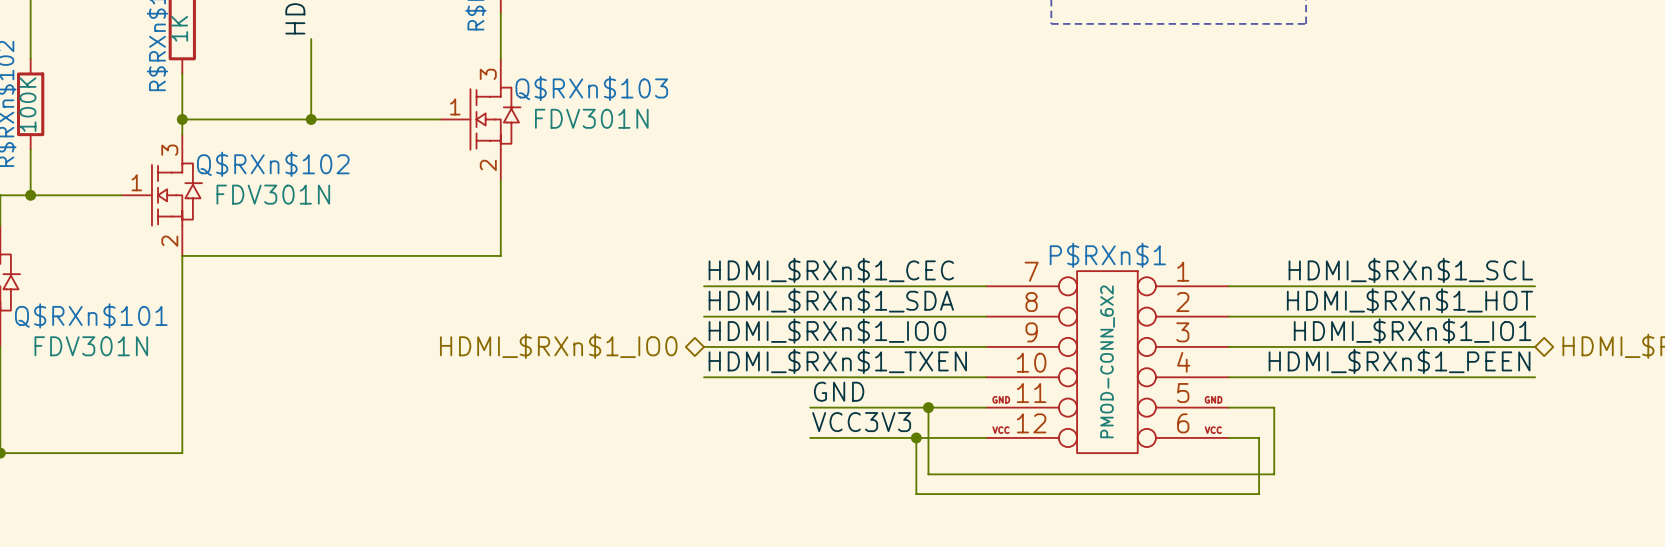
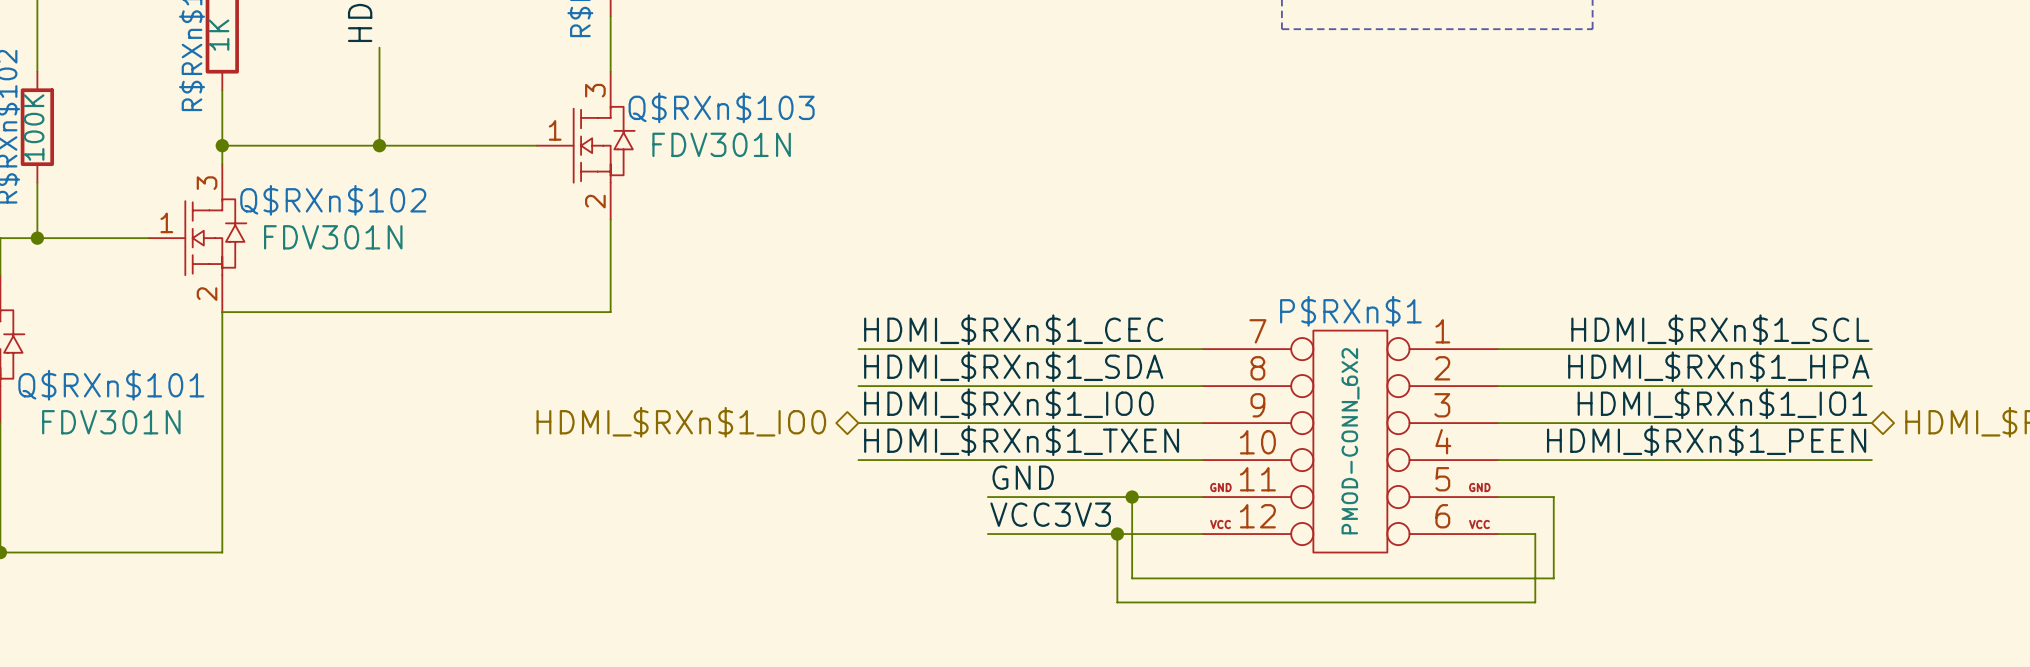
label: HDMI_$RXn$1_HOT (1409, 300) -> HDMI_$RXn$1_HPA (1718, 366)

